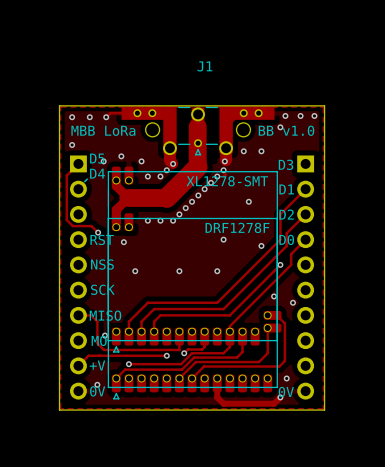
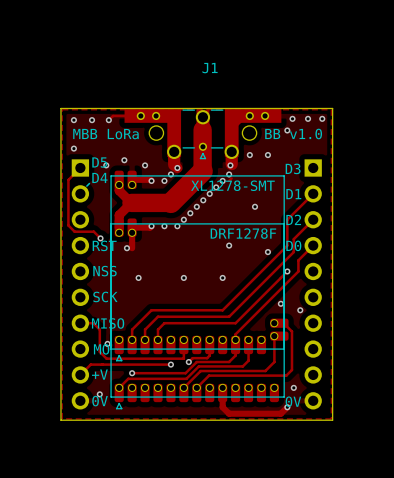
track: none -> (132, 179) (151, 180)
track: none -> (151, 226) (132, 227) (132, 248)

